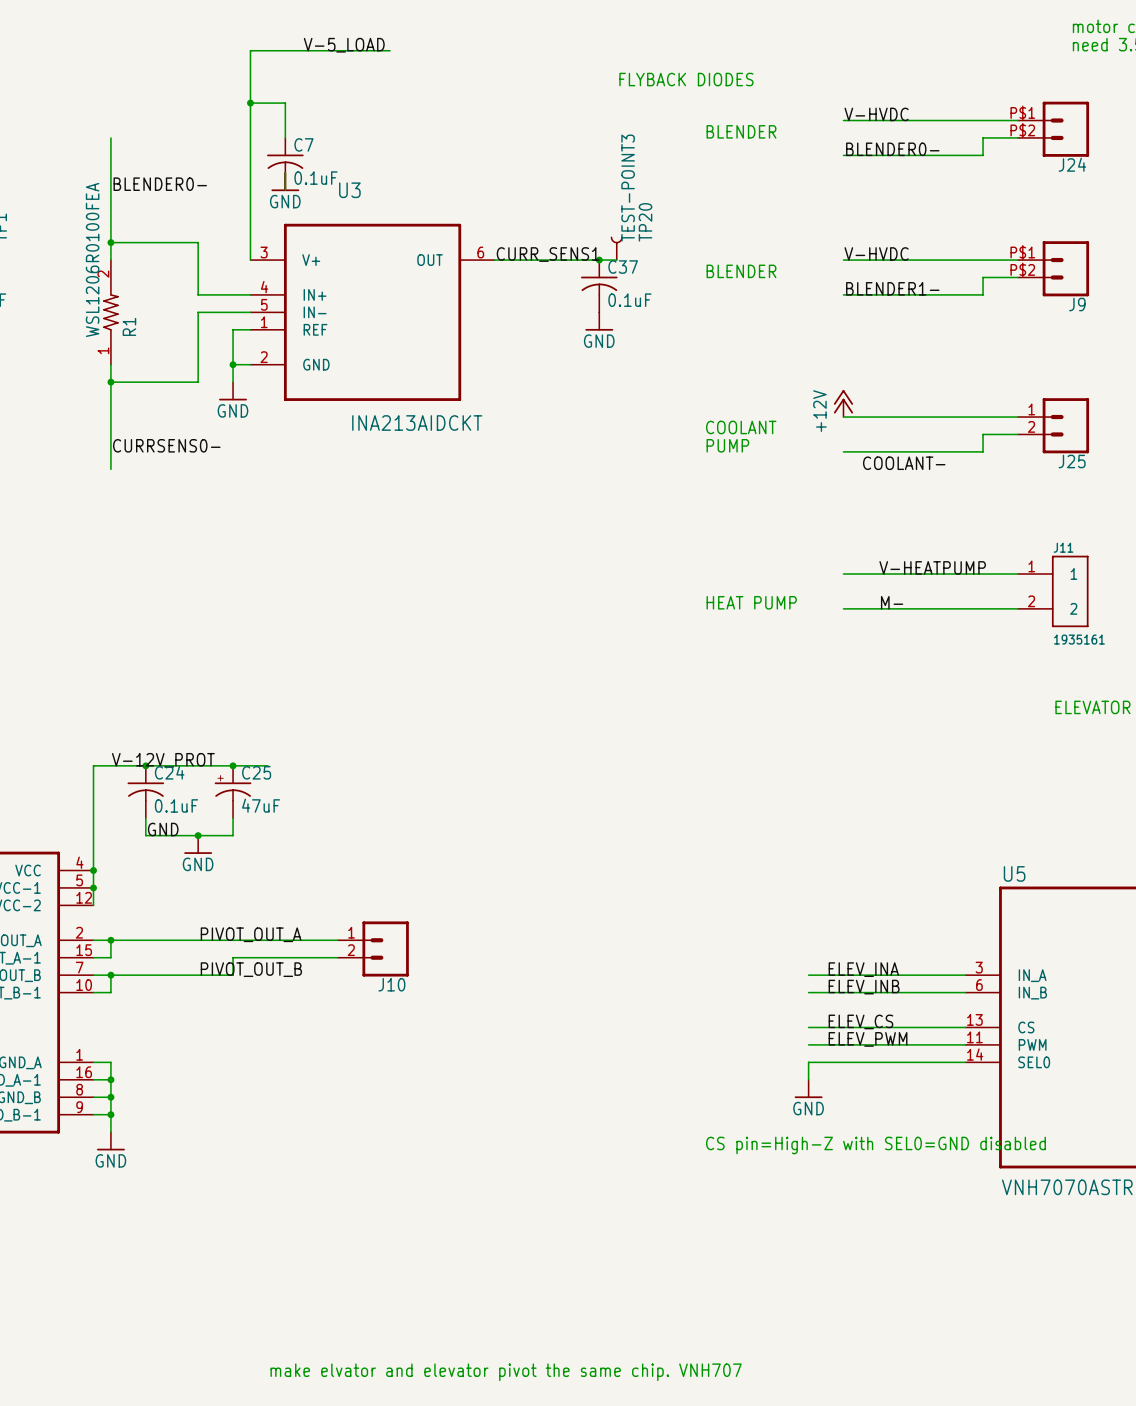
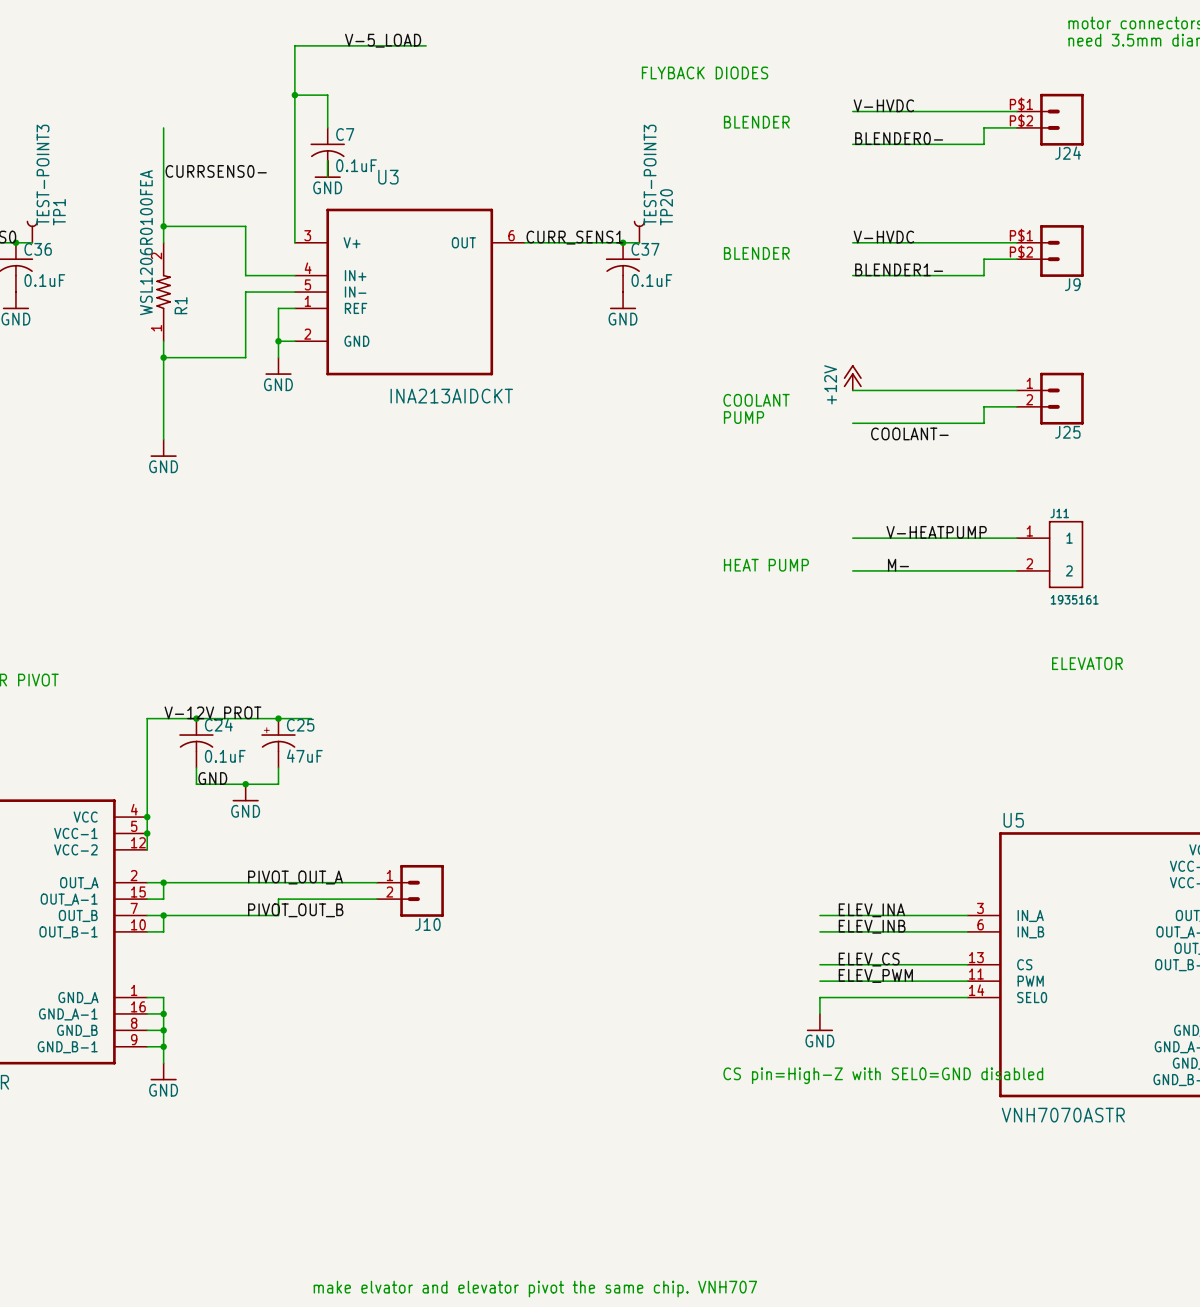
label: BLENDER0- (160, 184) -> CURRSENS0- (216, 171)
label: CURRSENS0- (166, 445) -> none
power symbol: none -> GND (163, 448)

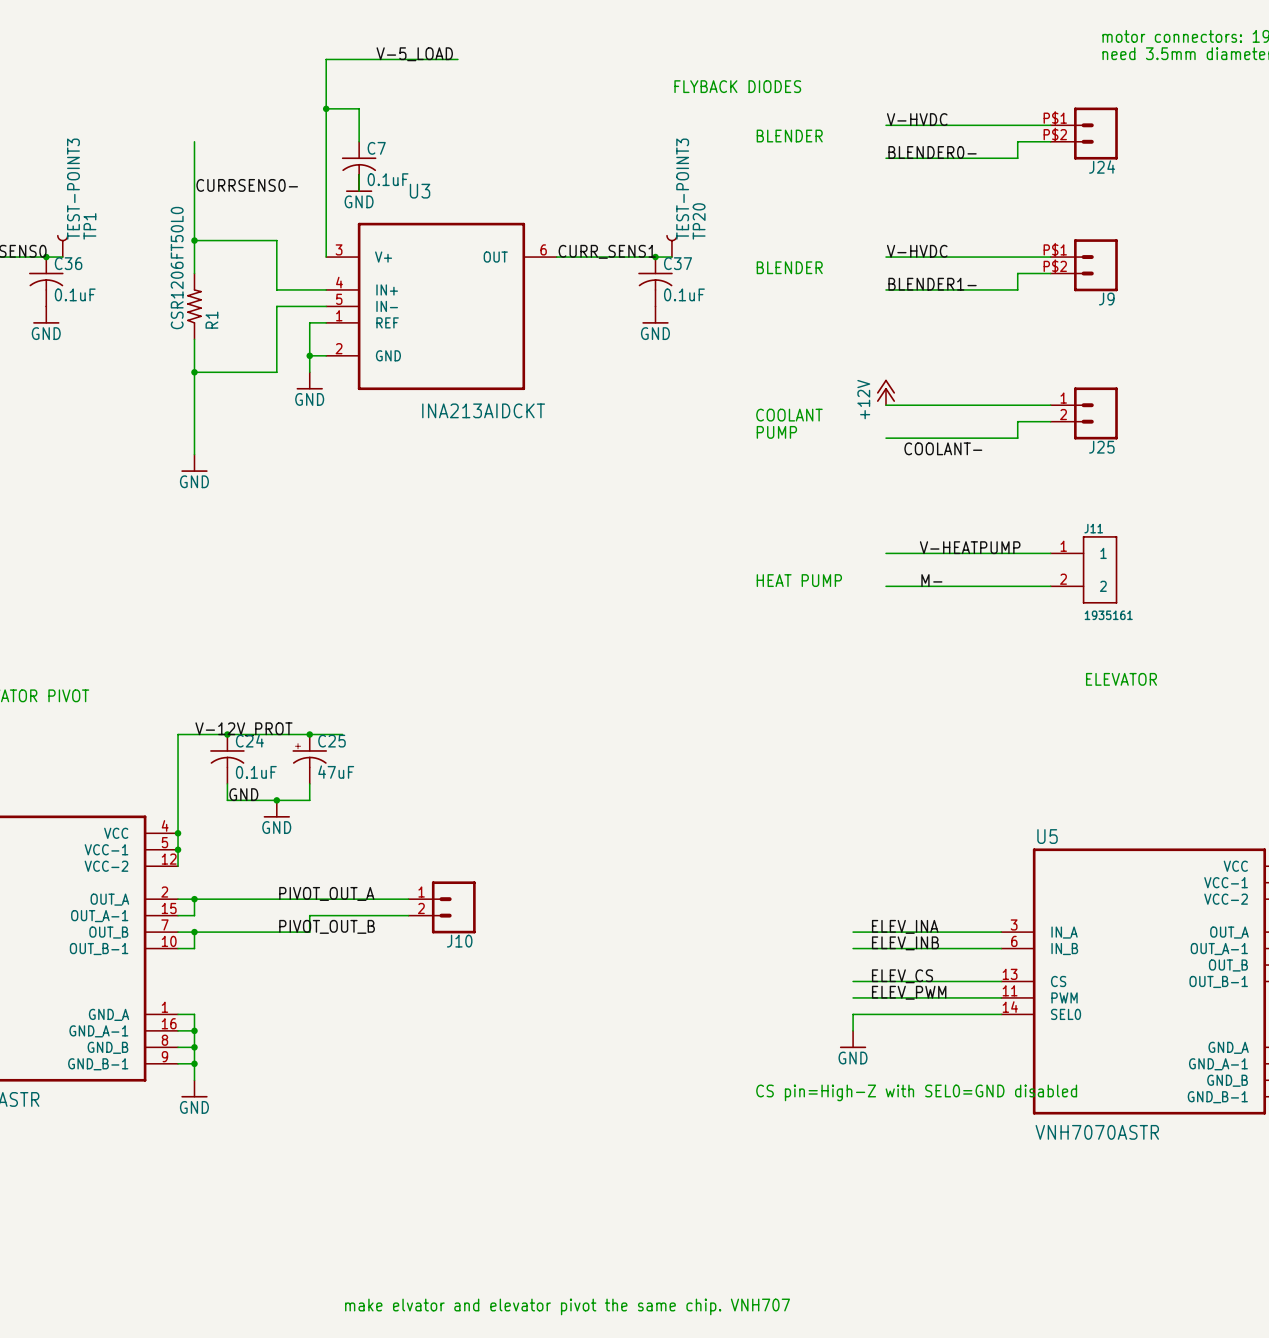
R1 value: WSL1206R0100FEA (146, 242) -> CSR1206FT50L0 (177, 268)
R1 symbol: [156, 242, 171, 342] -> [187, 273, 202, 340]

